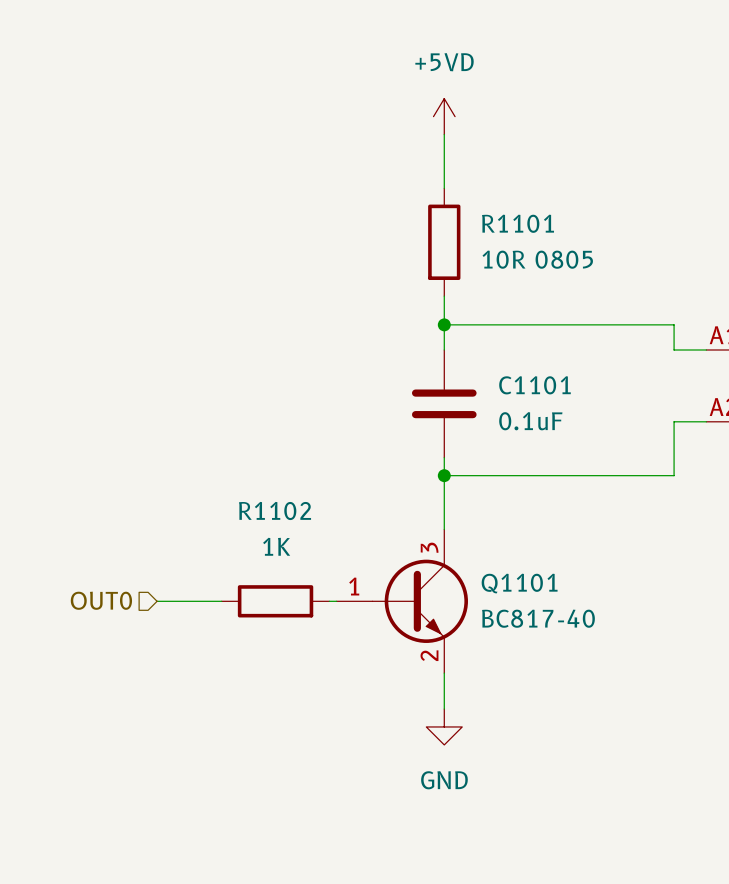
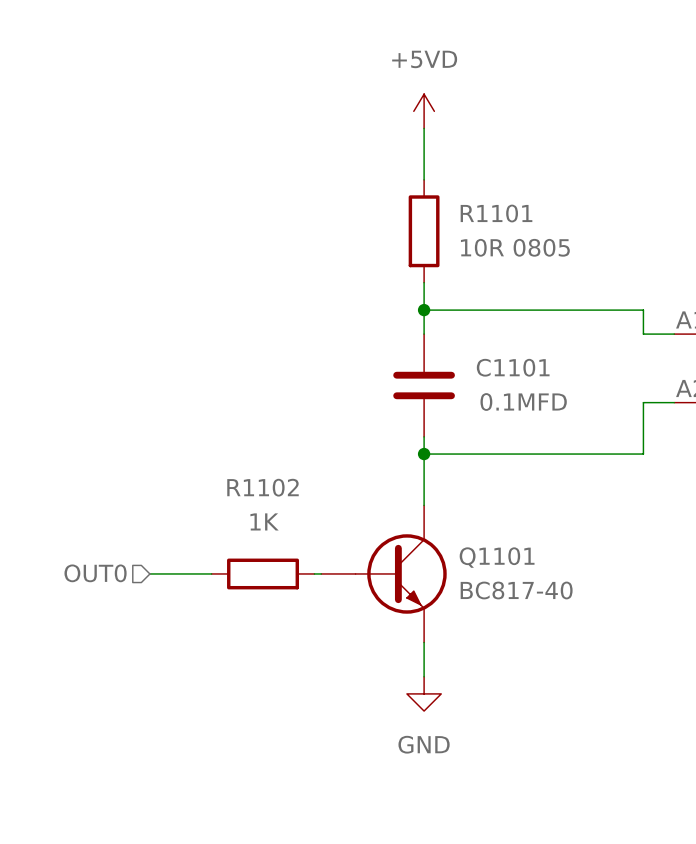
C1101 value: 0.1uF (530, 421) -> 0.1MFD (523, 402)
Q1101 pin number: 3 (429, 547) -> none
Q1101 pin number: 1 (354, 586) -> none
Q1101 pin number: 2 (429, 655) -> none

